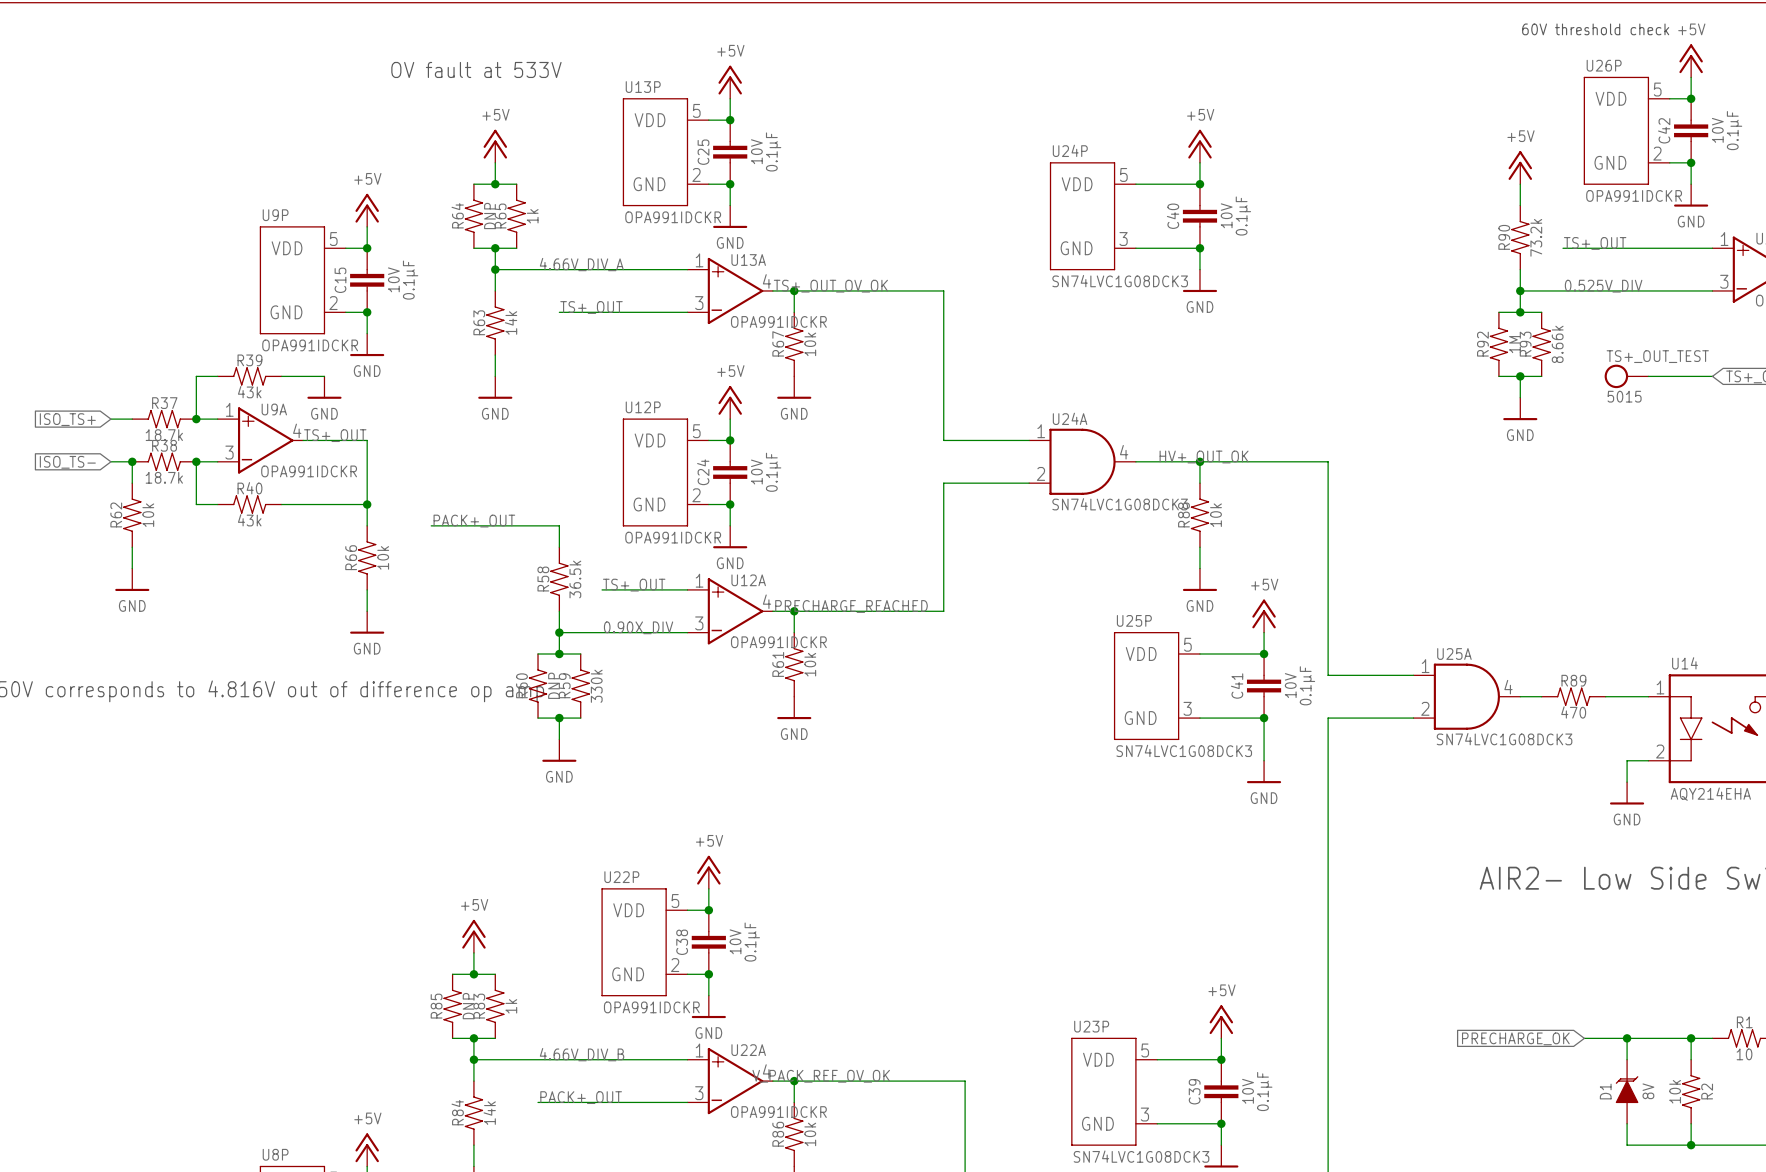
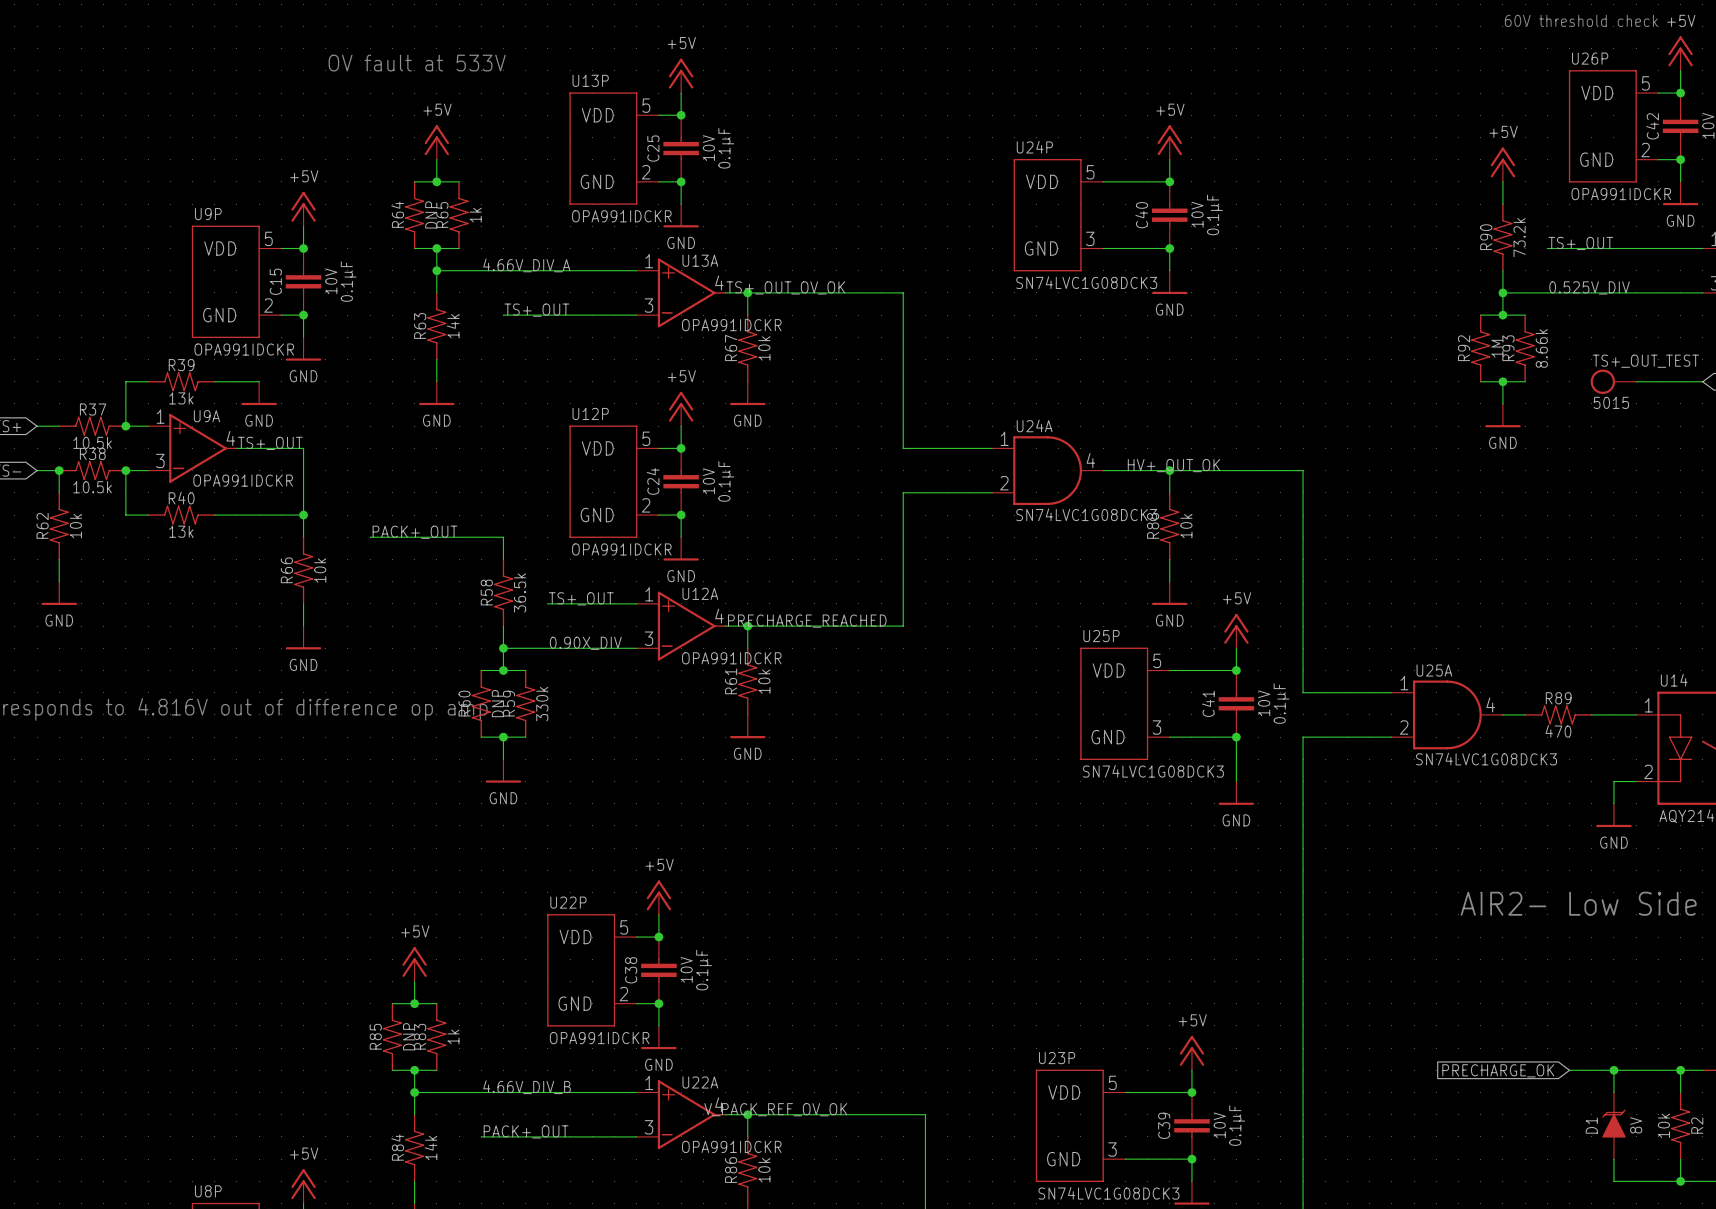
R39 text: 43k (249, 392) -> 13k (181, 398)
R37 text: 18.7k (164, 435) -> 10.5k (92, 442)
R38 text: 18.7k (164, 477) -> 10.5k (92, 487)
R40 text: 43k (249, 520) -> 13k (181, 531)

